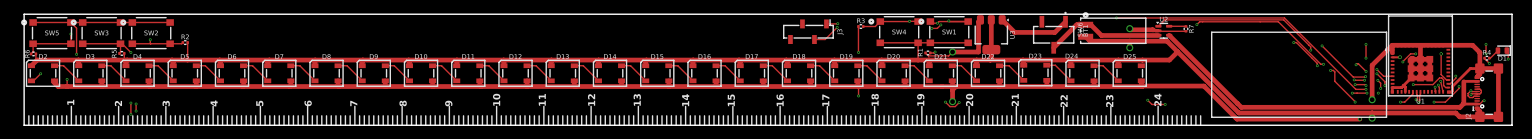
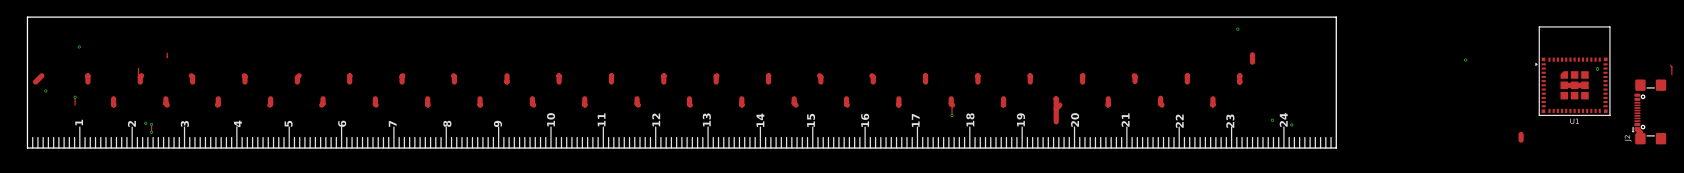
board edge: (24, 14) (1512, 14) (1512, 125) (1205, 125) -> (27, 24) (27, 17) (1336, 17) (1336, 148)
track: (1116, 18) (1284, 18) (1355, 89) (1366, 89) -> none
track: (980, 19) (978, 21) (978, 52) (952, 52) (948, 55) (928, 55) (925, 52) -> none
track: (991, 19) (990, 60) -> none
track: (1002, 19) (1014, 32) (1054, 32) (1065, 21) -> none
via: (948, 20) -> none
via: (909, 21) -> none
track: (918, 21) (880, 21) (875, 26) (863, 26) -> none
track: (968, 21) (930, 21) -> none
track: (33, 22) (170, 22) -> none
track: (70, 22) (76, 28) (76, 54) -> none
track: (837, 23) (826, 23) -> none
via: (837, 23) -> none
via: (937, 23) -> none
track: (940, 24) (937, 28) (931, 28) -> none
via: (940, 24) -> none
track: (1196, 24) (1199, 21) (1278, 21) (1320, 64) (1323, 64) -> none
via: (1196, 24) -> none
track: (858, 26) (858, 52) -> none
part: (860, 26) -> none
track: (1158, 26) (1164, 19) (1283, 19) (1310, 46) (1310, 50) -> none
track: (1169, 26) (1185, 26) -> none
track: (837, 27) (825, 39) (814, 39) -> none
via: (837, 27) -> none
part: (1112, 27) -> none
via: (931, 28) -> none
track: (1129, 28) (1153, 29) -> none
via: (1129, 28) -> none
part: (1185, 28) -> none
track: (1152, 29) (1185, 31) -> none
part: (1163, 30) -> none
part: (808, 31) -> none
part: (895, 32) -> none
part: (945, 32) -> none
part: (1053, 32) -> none
line: (1211, 32) (1386, 32) (1386, 117) (1211, 117) (1211, 32) -> none
part: (47, 33) -> none
part: (97, 33) -> none
part: (147, 33) -> none
track: (70, 34) (70, 43) (33, 43) (33, 51) (31, 53) -> none
part: (991, 34) -> none
track: (1158, 35) (1101, 35) (1090, 24) (1076, 24) (1053, 47) -> none
track: (1169, 35) (1237, 103) -> none
track: (1085, 36) (1090, 41) (1167, 41) (1238, 112) (1455, 112) (1459, 116) (1498, 116) (1498, 68) (1470, 68) (1452, 86) (1452, 90) (1448, 92) -> none
via: (150, 39) -> none
track: (182, 42) (132, 43) -> none
part: (185, 42) -> none
track: (187, 42) (187, 60) -> none
track: (880, 42) (968, 42) -> none
track: (918, 42) (918, 60) -> none
track: (1293, 42) (1296, 42) (1317, 63) (1317, 65) -> none
via: (1293, 42) -> none
track: (82, 43) (122, 43) (130, 52) -> none
track: (120, 43) (119, 53) -> none
track: (1366, 44) (1366, 58) -> none
via: (1366, 44) -> none
track: (1486, 44) (1486, 53) -> none
via: (1486, 44) -> none
track: (1322, 45) (1353, 77) (1365, 76) -> none
track: (1392, 45) (1372, 65) (1372, 99) -> none
track: (1392, 45) (1392, 52) -> none
track: (1392, 45) (1472, 45) (1479, 52) (1479, 74) (1477, 76) -> none
track: (1420, 45) (1420, 78) -> none
via: (1129, 47) -> none
via: (1310, 50) -> none
track: (1497, 50) (1489, 58) -> none
part: (1503, 50) -> none
track: (1177, 51) (1169, 60) (37, 60) (35, 53) -> none
via: (130, 52) -> none
via: (858, 52) -> none
part: (927, 52) -> none
track: (935, 52) (930, 52) -> none
via: (935, 52) -> none
via: (952, 52) -> none
part: (33, 53) -> none
part: (121, 53) -> none
track: (1415, 53) (1410, 53) (1402, 61) -> none
via: (1415, 53) -> none
track: (1441, 53) (1441, 74) (1448, 79) -> none
via: (1486, 53) -> none
via: (76, 54) -> none
track: (1400, 57) (1392, 57) -> none
via: (1400, 57) -> none
via: (1366, 58) -> none
track: (1484, 58) (1489, 63) -> none
part: (1486, 58) -> none
via: (1508, 59) -> none
via: (1402, 61) -> none
via: (1489, 63) -> none
via: (1323, 64) -> none
track: (1356, 64) (1358, 63) (1366, 71) -> none
via: (1356, 64) -> none
track: (54, 65) (63, 65) (78, 80) -> none
track: (101, 65) (110, 65) (125, 80) -> none
track: (149, 65) (158, 65) (173, 80) -> none
track: (196, 65) (205, 65) (220, 80) -> none
track: (243, 65) (252, 65) (267, 80) -> none
track: (290, 65) (299, 65) (314, 80) -> none
track: (338, 65) (347, 65) (362, 80) -> none
track: (385, 65) (394, 65) (409, 80) -> none
track: (432, 65) (441, 65) (456, 80) -> none
track: (479, 65) (488, 65) (503, 80) -> none
track: (527, 65) (536, 65) (551, 80) -> none
track: (574, 65) (583, 65) (598, 80) -> none
track: (621, 65) (630, 65) (645, 80) -> none
track: (668, 65) (677, 65) (692, 80) -> none
track: (716, 65) (725, 65) (740, 80) -> none
track: (763, 65) (772, 65) (787, 80) -> none
track: (810, 65) (819, 65) (834, 80) -> none
track: (857, 65) (866, 65) (881, 80) -> none
track: (905, 65) (914, 65) (929, 80) -> none
track: (952, 65) (961, 65) (976, 80) -> none
track: (999, 65) (1009, 65) (1023, 80) -> none
track: (1046, 65) (1055, 65) (1070, 80) -> none
track: (1094, 65) (1103, 65) (1118, 80) -> none
via: (1317, 65) -> none
track: (1376, 69) (1383, 76) (1392, 76) -> none
via: (1376, 69) -> none
track: (1330, 70) (1334, 71) (1334, 81) (1355, 102) -> none
via: (1330, 70) -> none
via: (1366, 71) -> none
part: (1035, 72) -> none
track: (40, 73) (31, 80) -> none
part: (43, 73) -> none
part: (90, 73) -> none
part: (137, 73) -> none
part: (184, 73) -> none
part: (232, 73) -> none
part: (279, 73) -> none
part: (326, 73) -> none
part: (373, 73) -> none
part: (421, 73) -> none
part: (468, 73) -> none
part: (515, 73) -> none
part: (562, 73) -> none
part: (610, 73) -> none
part: (657, 73) -> none
part: (704, 73) -> none
part: (751, 73) -> none
part: (799, 73) -> none
part: (846, 73) -> none
part: (893, 73) -> none
part: (940, 73) -> none
part: (988, 73) -> none
part: (1082, 73) -> none
part: (1129, 73) -> none
track: (1376, 73) (1384, 81) (1384, 85) -> none
via: (1376, 73) -> none
via: (1365, 76) -> none
track: (1455, 76) (1448, 83) -> none
via: (1455, 76) -> none
track: (1410, 78) (1429, 78) (1429, 59) (1411, 59) (1411, 78) (1401, 87) (1392, 87) (1392, 92) -> none
track: (1354, 79) (1364, 80) -> none
via: (1354, 79) -> none
track: (54, 80) (58, 86) (1142, 86) (1141, 80) -> none
via: (1364, 80) -> none
track: (1377, 80) (1380, 83) (1380, 88) -> none
via: (1377, 80) -> none
track: (1440, 81) (1443, 91) -> none
via: (1440, 81) -> none
track: (1477, 81) (1463, 81) (1463, 103) -> none
track: (1355, 84) (1366, 85) -> none
via: (1355, 84) -> none
track: (1413, 84) (1432, 84) (1441, 78) (1443, 85) (1448, 87) -> none
via: (1413, 84) -> none
via: (1366, 85) -> none
via: (1384, 85) -> none
track: (1403, 85) (1405, 91) -> none
track: (1438, 85) (1439, 91) -> none
via: (1438, 85) -> none
track: (1141, 86) (1203, 86) (1236, 119) (1359, 119) -> none
track: (1459, 86) (1445, 102) (1434, 102) -> none
via: (1459, 86) -> none
track: (1435, 87) (1435, 91) -> none
via: (1435, 87) -> none
via: (1380, 88) -> none
via: (1366, 89) -> none
track: (1477, 89) (1481, 90) (1480, 93) (1470, 94) -> none
via: (1470, 90) -> none
track: (1412, 91) (1404, 102) (1400, 102) -> none
track: (1416, 91) (1416, 99) -> none
track: (1420, 91) (1418, 102) -> none
track: (1477, 91) (1470, 90) (1468, 93) (1469, 97) (1477, 96) -> none
track: (1352, 93) (1366, 93) -> none
via: (1352, 93) -> none
via: (1366, 93) -> none
via: (1378, 93) -> none
via: (1470, 94) -> none
via: (1372, 99) -> none
via: (1416, 99) -> none
track: (1147, 100) (1151, 104) (1165, 104) -> none
track: (1484, 100) (1479, 104) (1463, 103) -> none
via: (1484, 100) -> none
via: (952, 101) -> none
track: (945, 102) (949, 106) (955, 106) (959, 102) -> none
via: (945, 102) -> none
via: (959, 102) -> none
via: (1355, 102) -> none
via: (1400, 102) -> none
via: (1418, 102) -> none
via: (1434, 102) -> none
track: (130, 103) (130, 114) -> none
track: (1237, 103) (1241, 107) (1460, 107) (1463, 103) -> none
via: (130, 114) -> none
via: (1372, 118) -> none
via: (1359, 119) -> none

